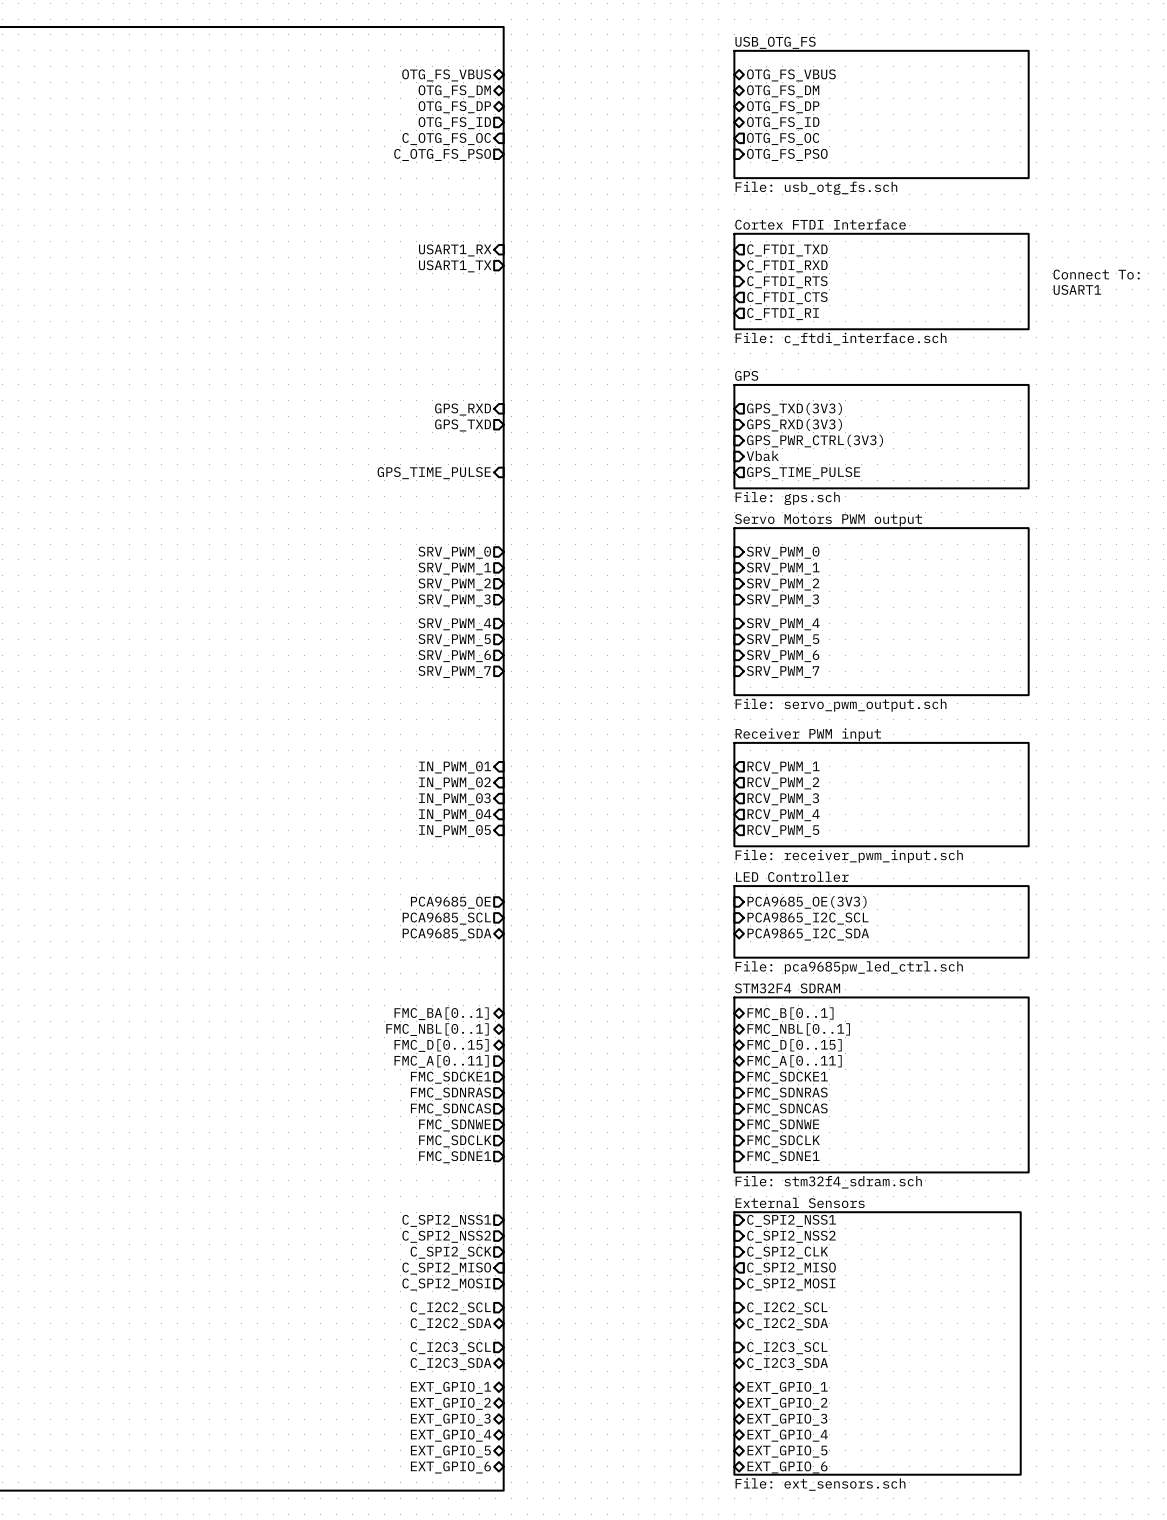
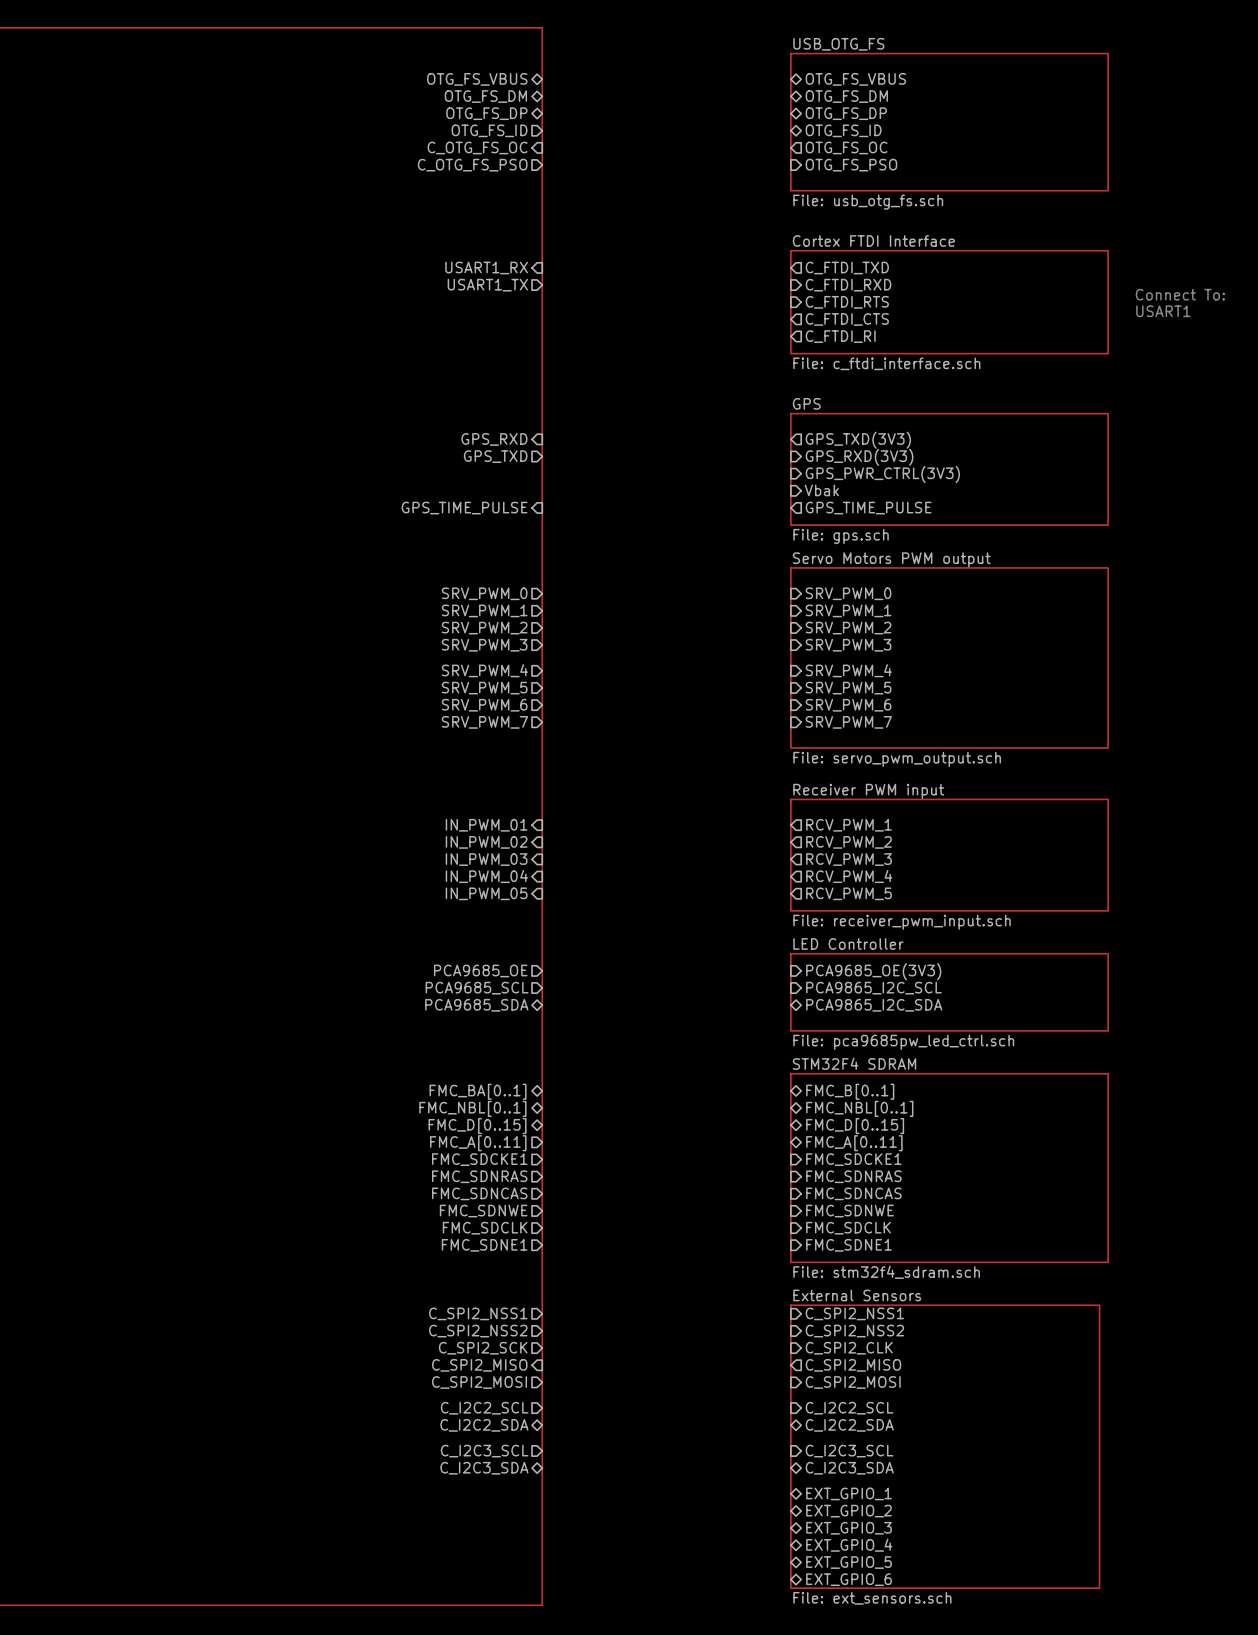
sheet pin: EXT_GPIO_1 (451, 1387) -> none
sheet pin: EXT_GPIO_2 (450, 1403) -> none
sheet pin: EXT_GPIO_3 (450, 1419) -> none
sheet pin: EXT_GPIO_4 (451, 1435) -> none
sheet pin: EXT_GPIO_5 (450, 1451) -> none
sheet pin: EXT_GPIO_6 (450, 1467) -> none

